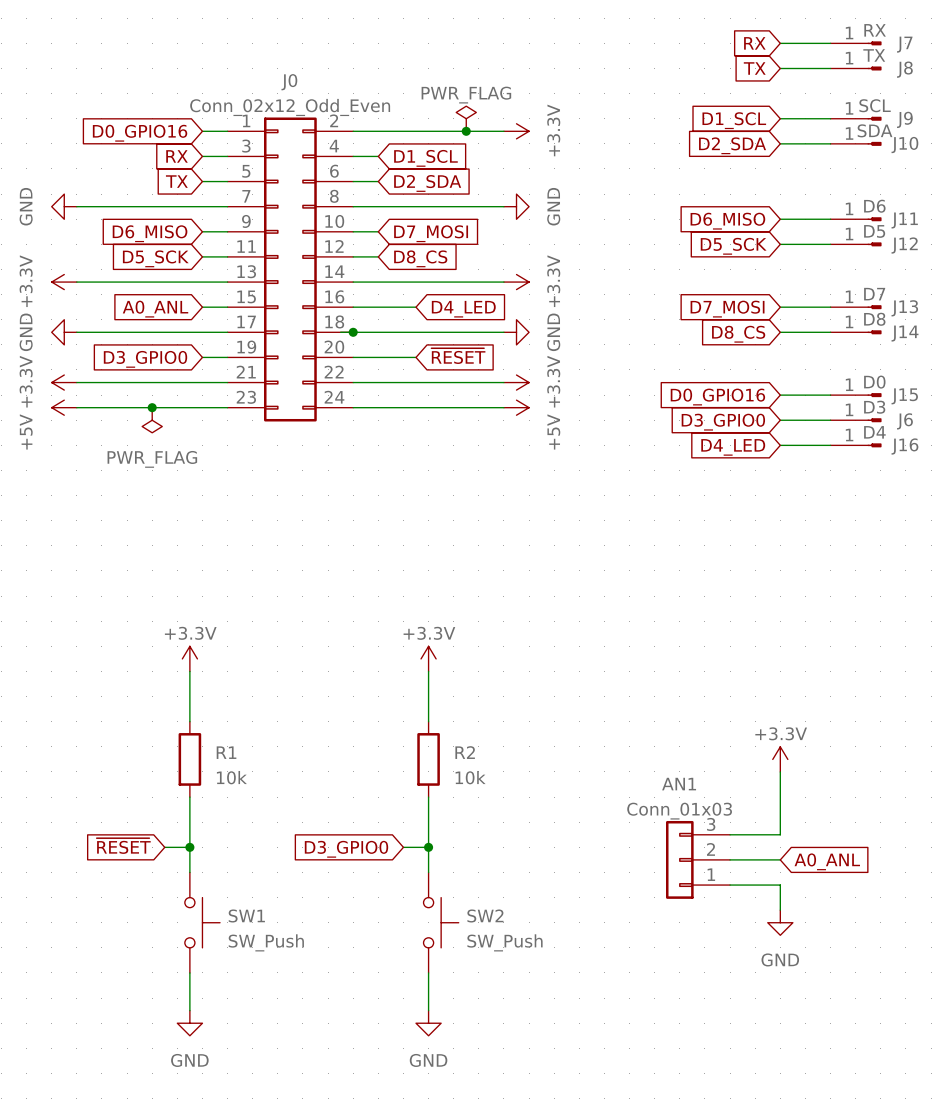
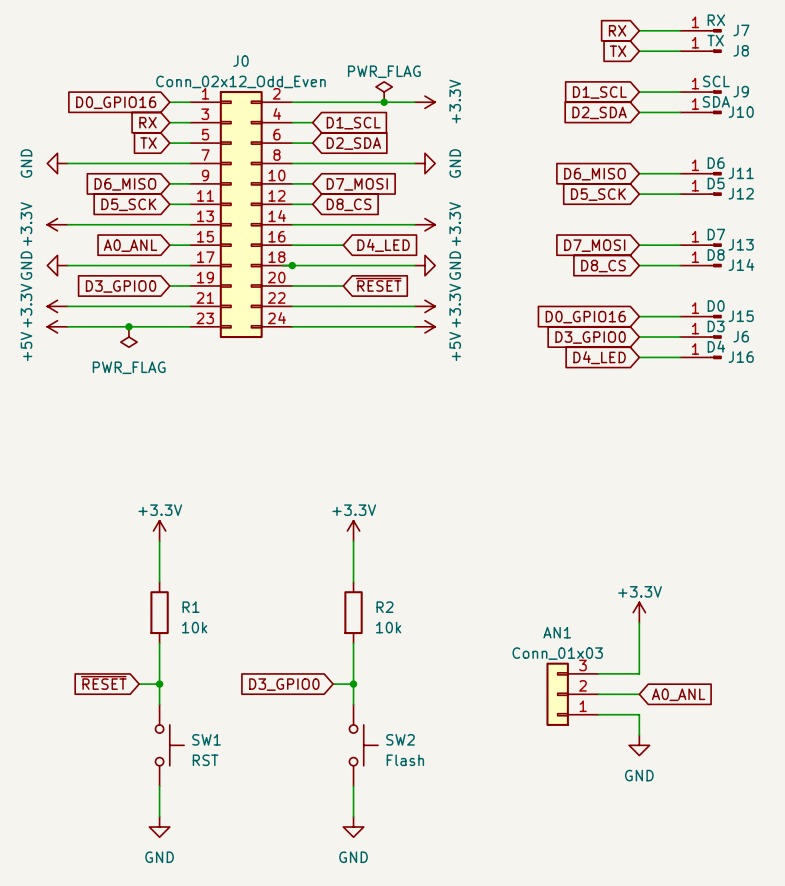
SW1 value: SW_Push (266, 942) -> RST (205, 760)
SW2 value: SW_Push (505, 942) -> Flash (405, 760)

